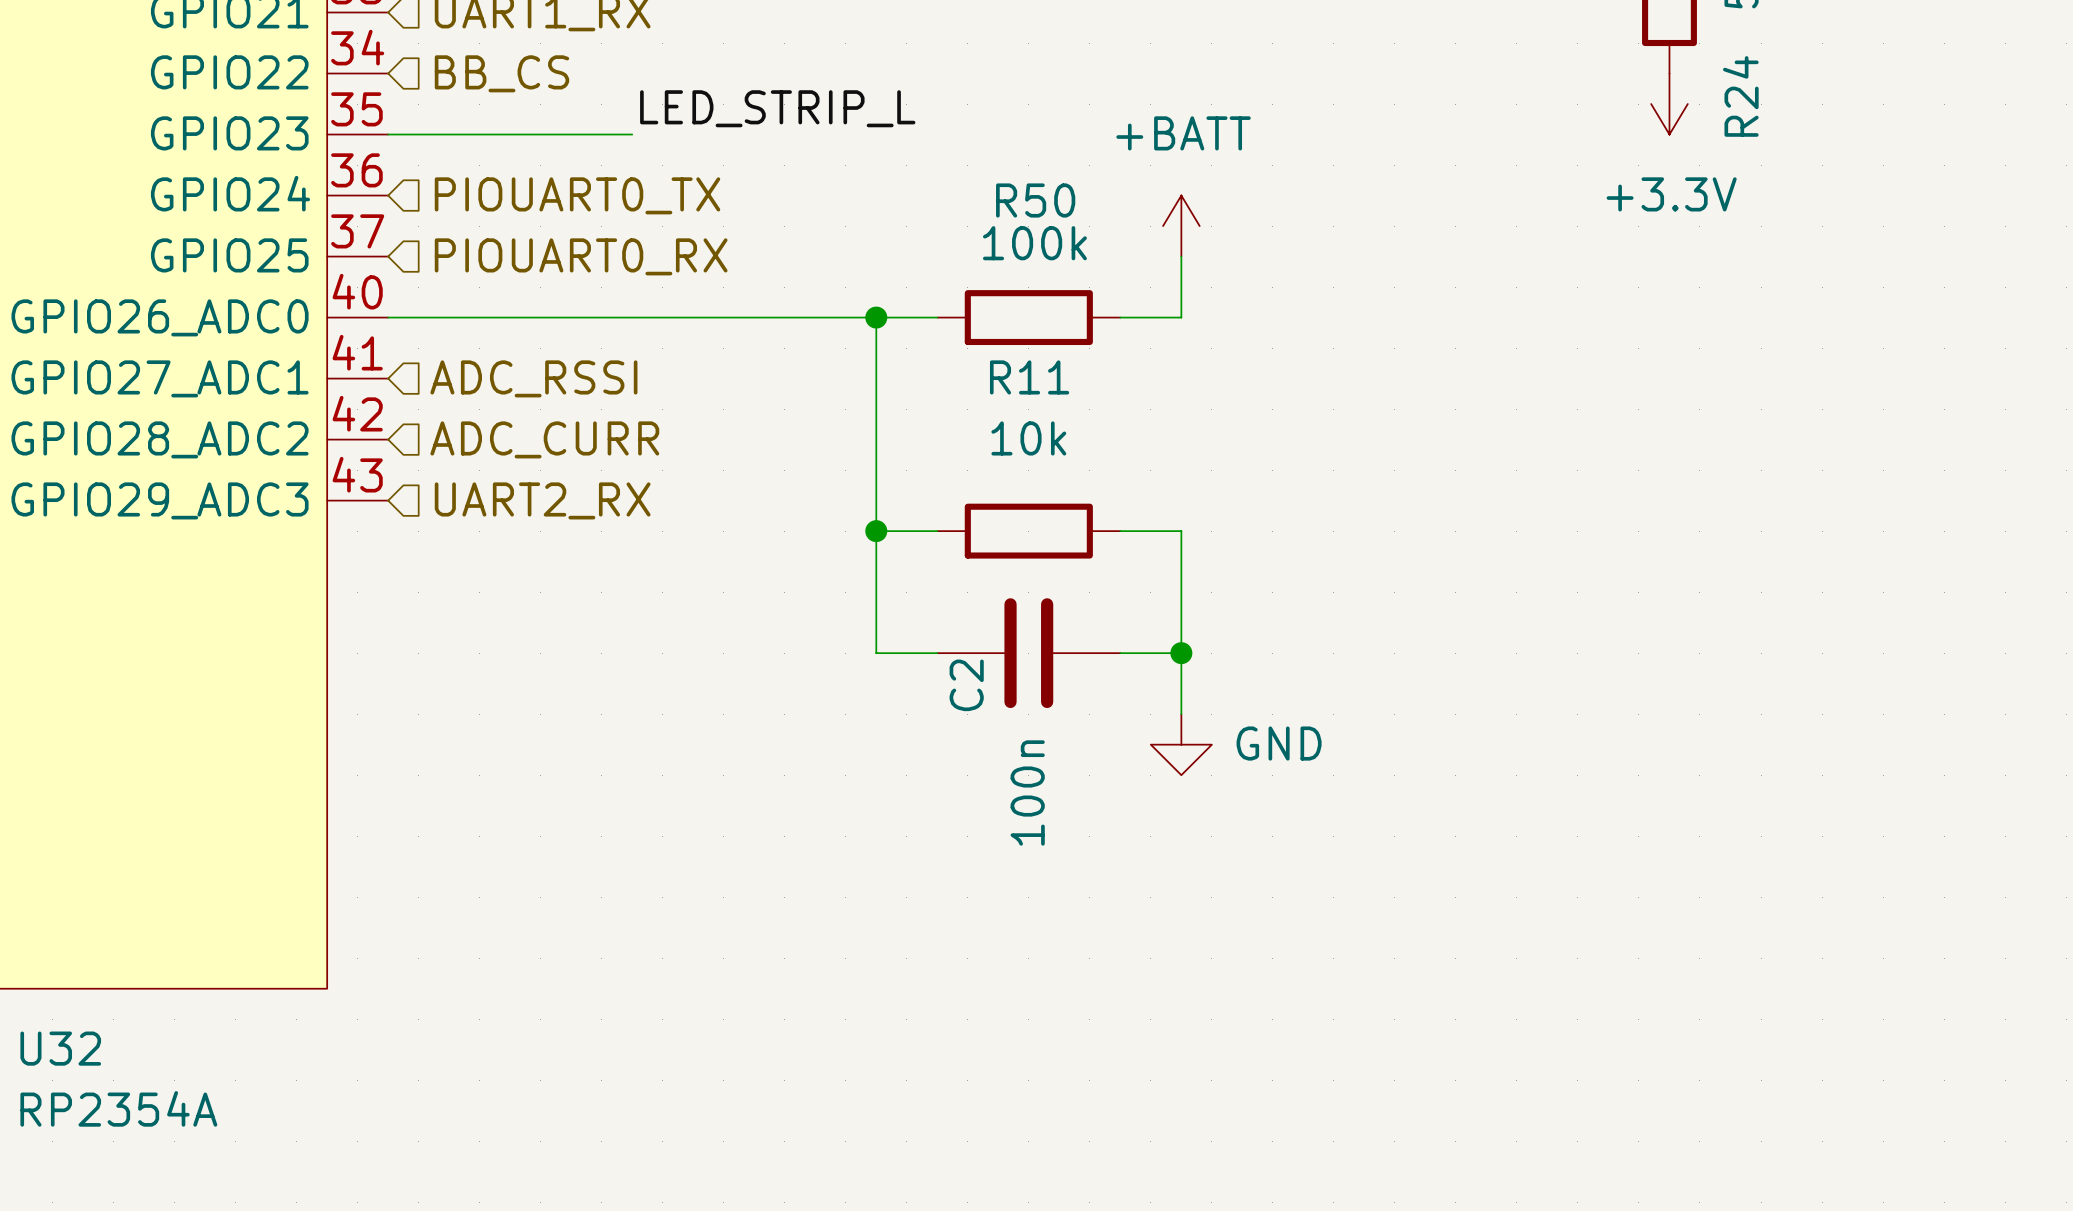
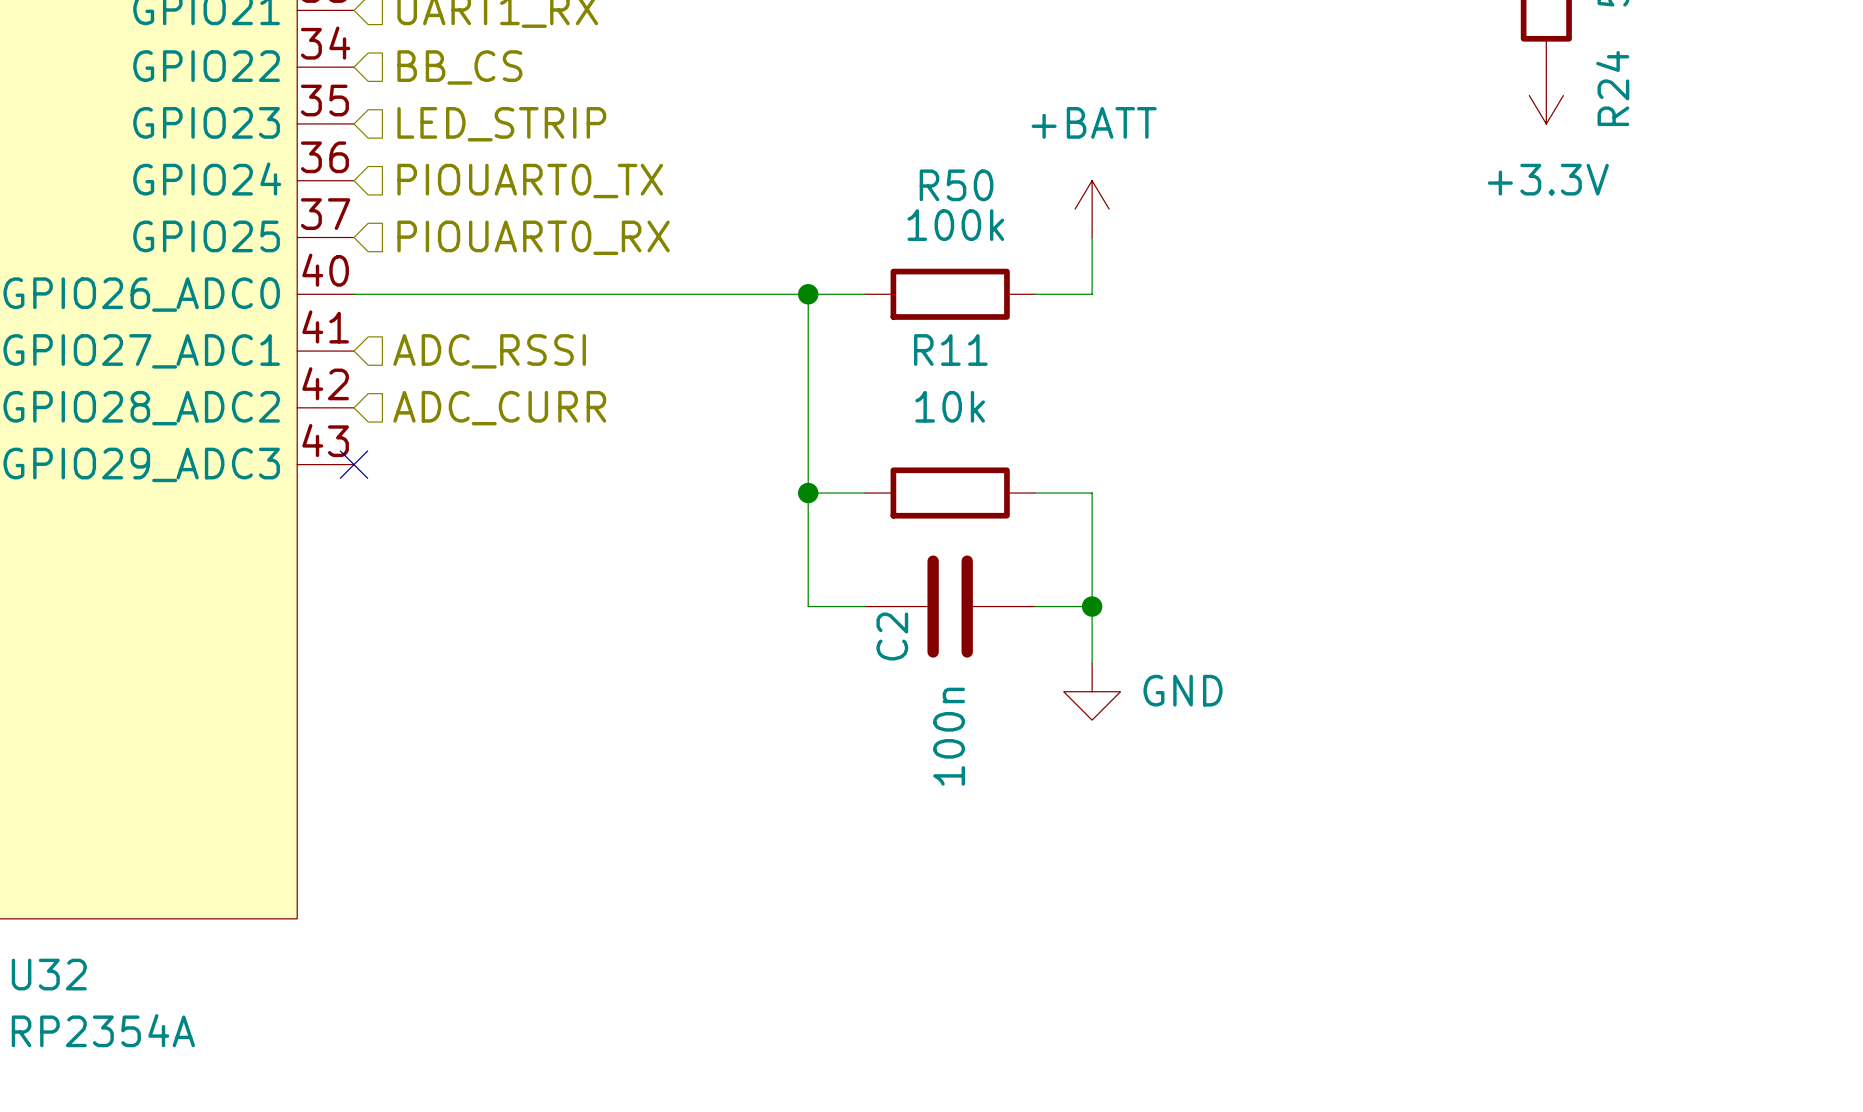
label: LED_STRIP_L (777, 108) -> none
wire: (388, 134) (632, 134) -> none
hierarchical label: none -> LED_STRIP (501, 124)
no-connect mark: none -> (353, 464)
hierarchical label: UART2_RX (542, 500) -> none

